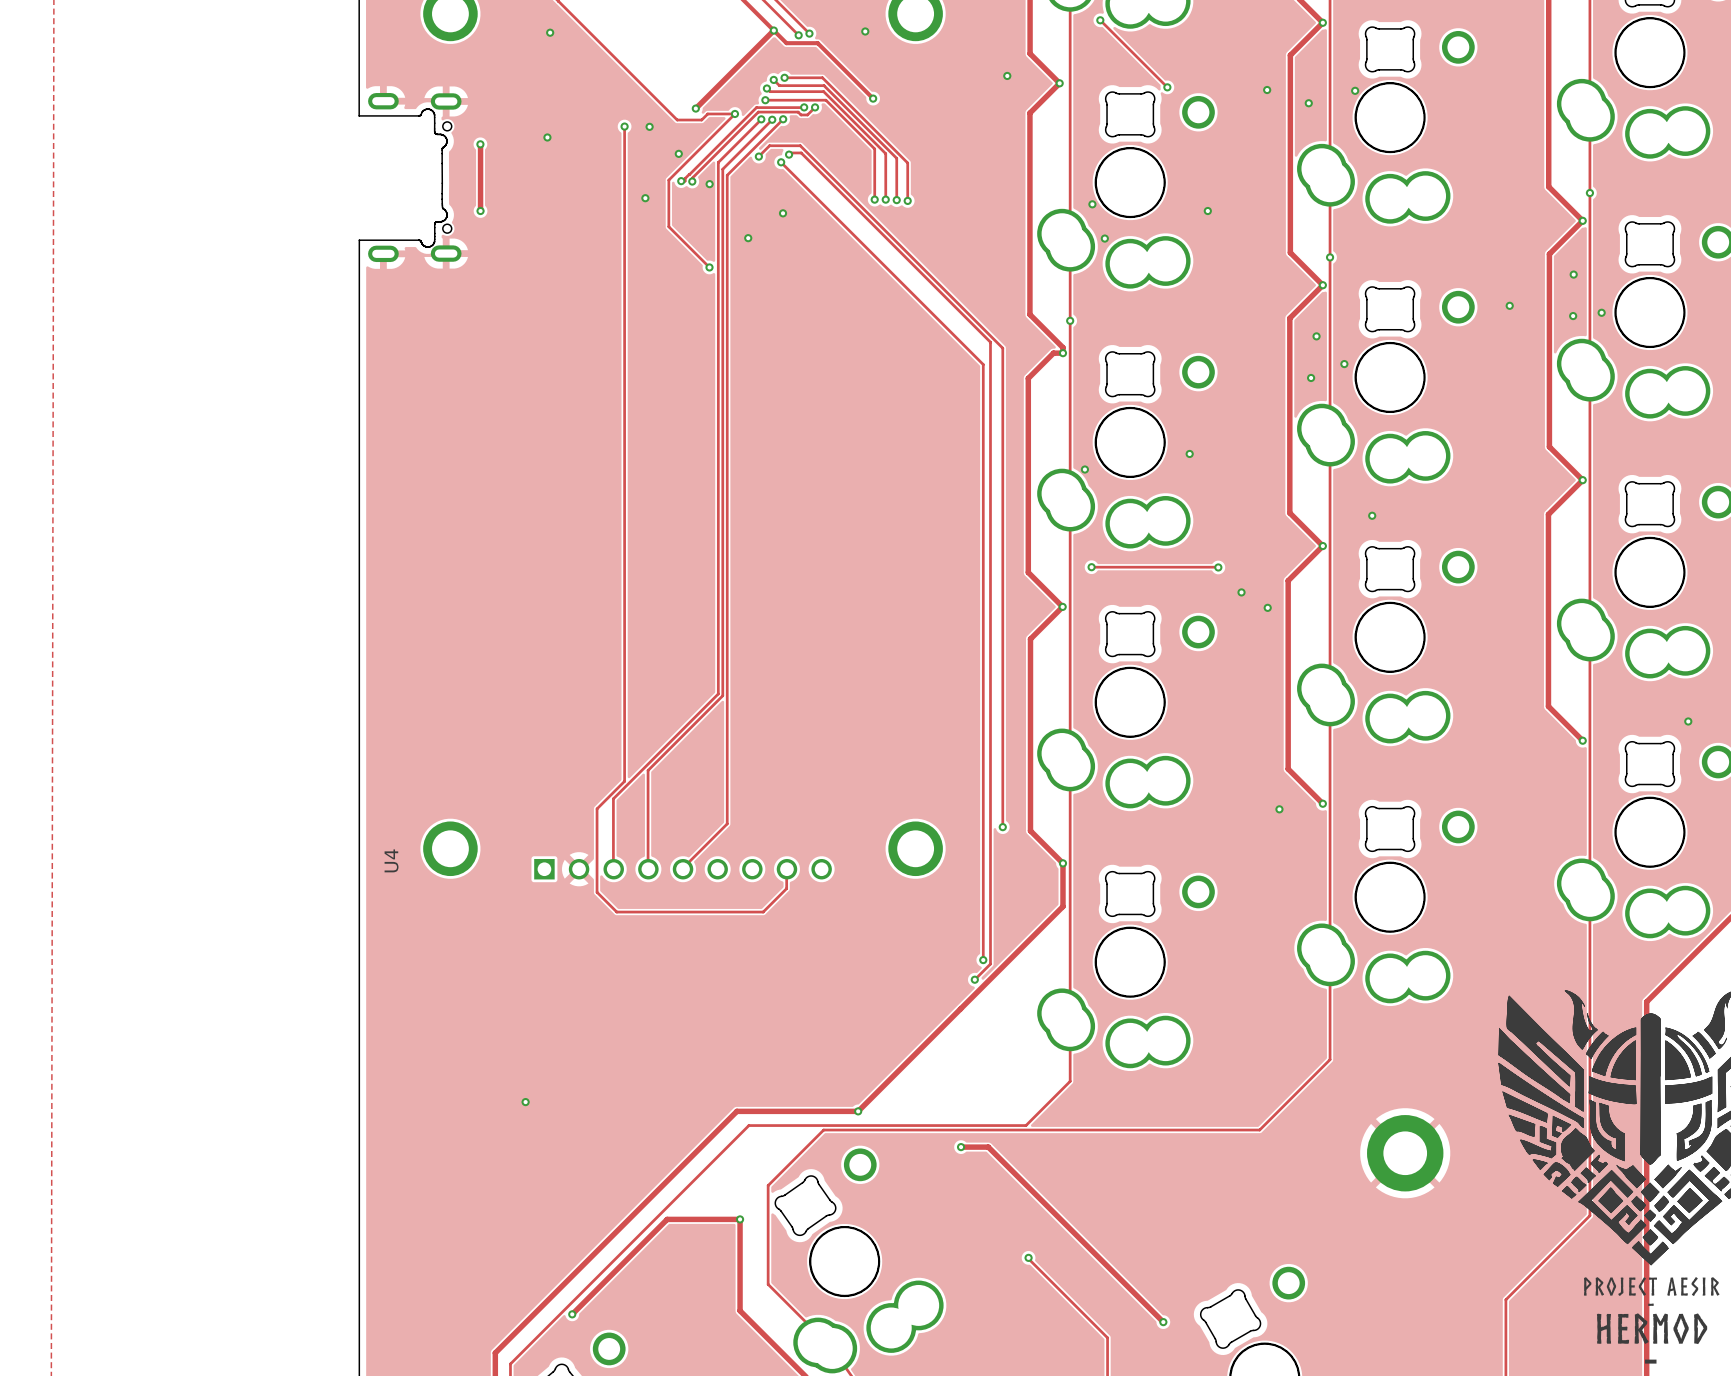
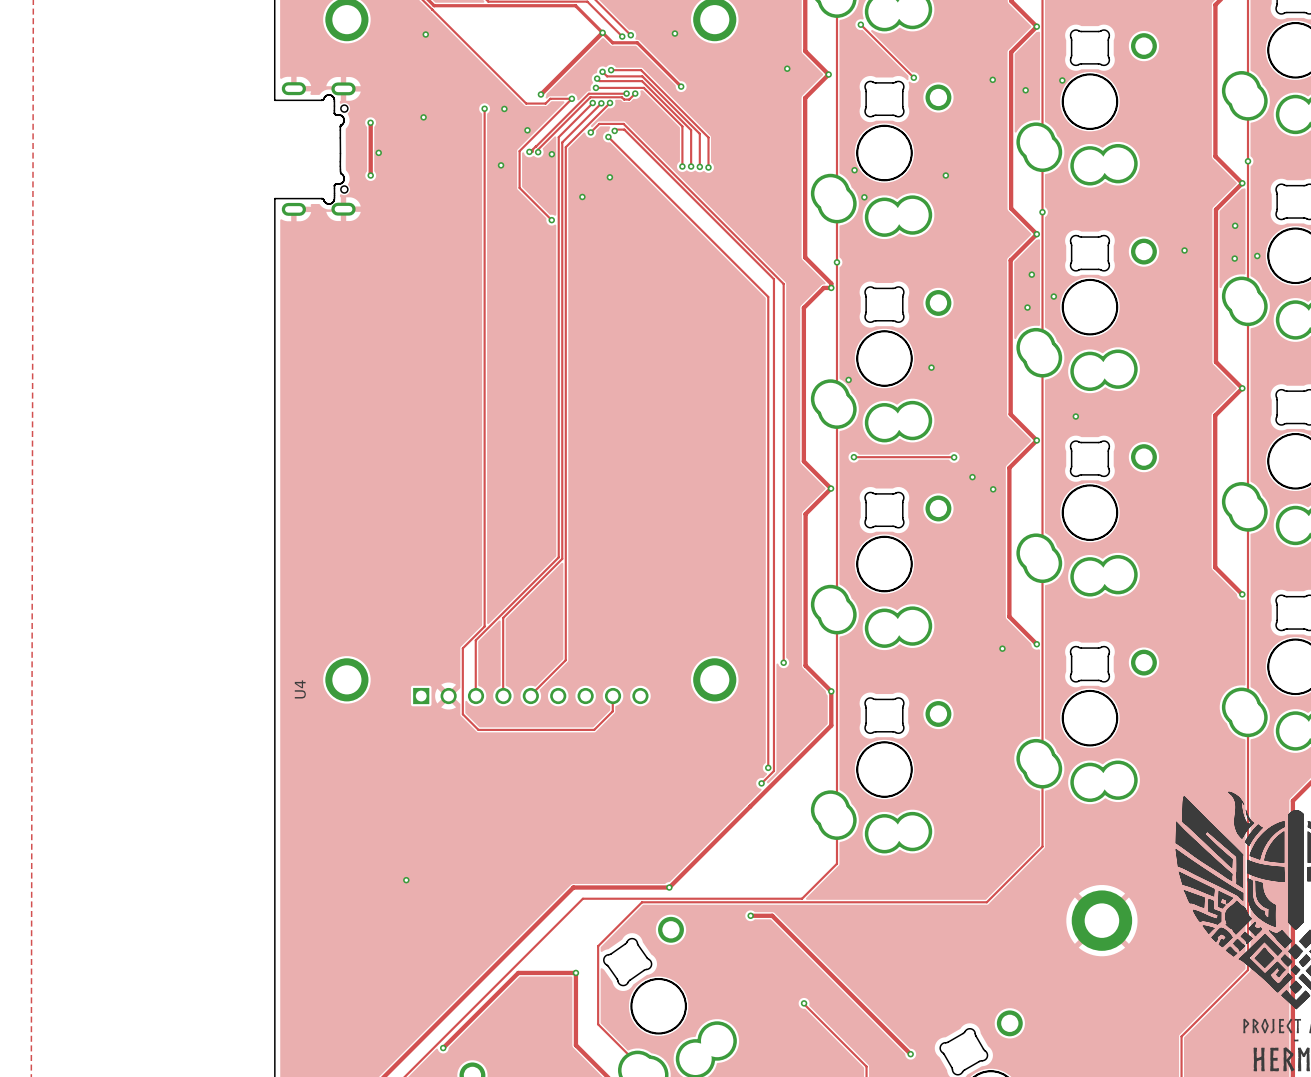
via: none -> (378, 152)

